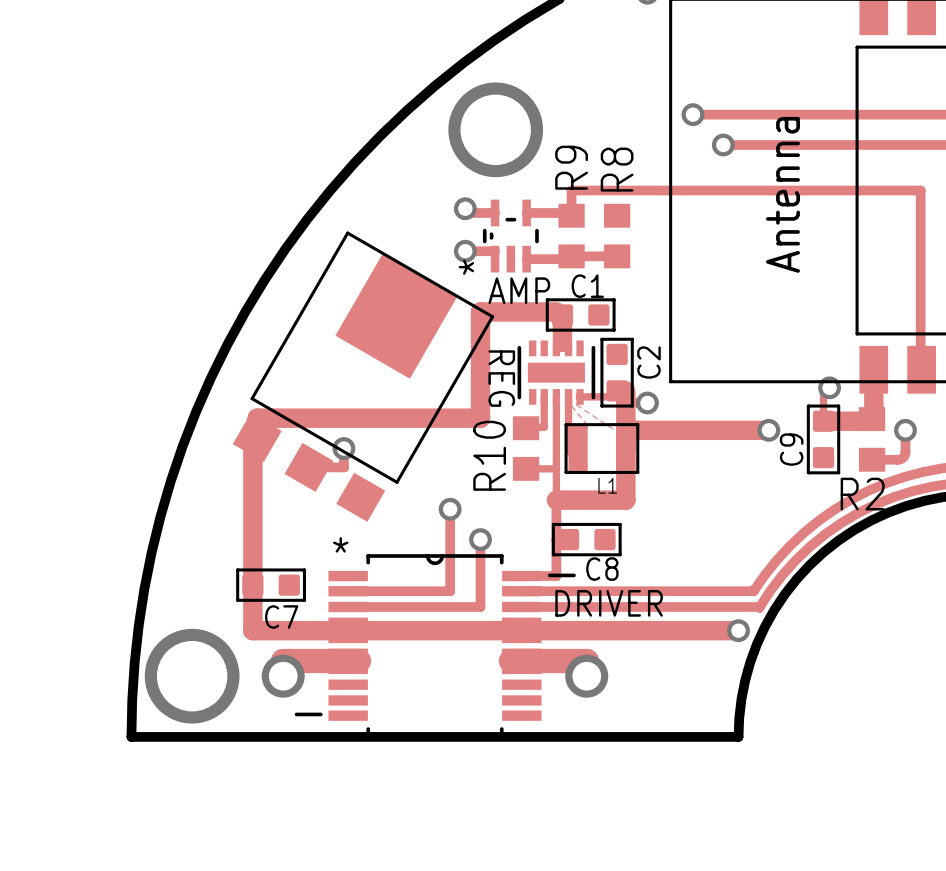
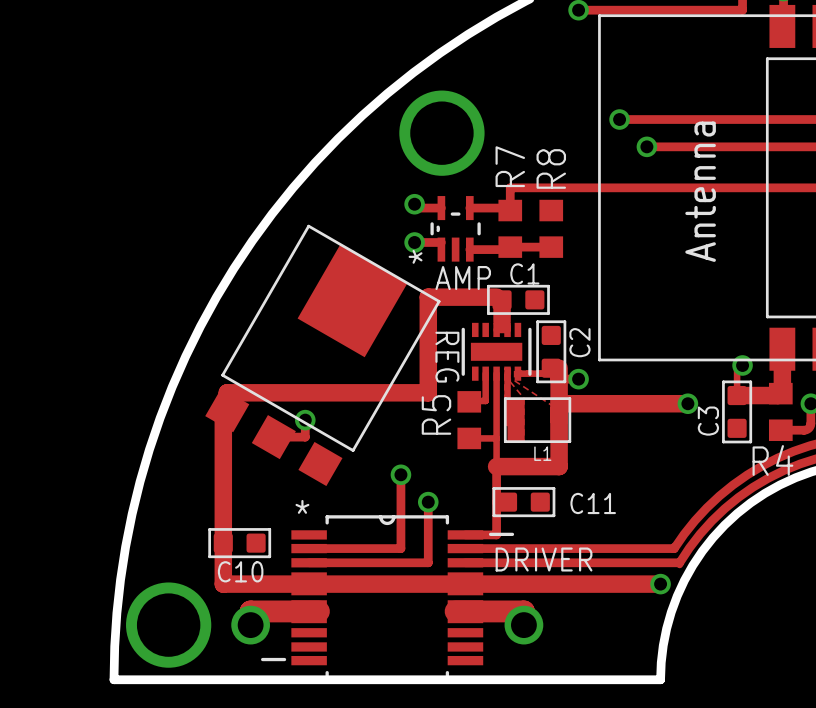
R9 name: R9 (571, 167) -> R7 (510, 166)
C9 name: C9 (791, 449) -> C3 (708, 421)
R10 name: R10 (489, 455) -> R5 (436, 414)
R2 name: R2 (862, 494) -> R4 (772, 460)
C8 name: C8 (602, 569) -> C11 (593, 503)
C7 name: C7 (281, 617) -> C10 (240, 571)

